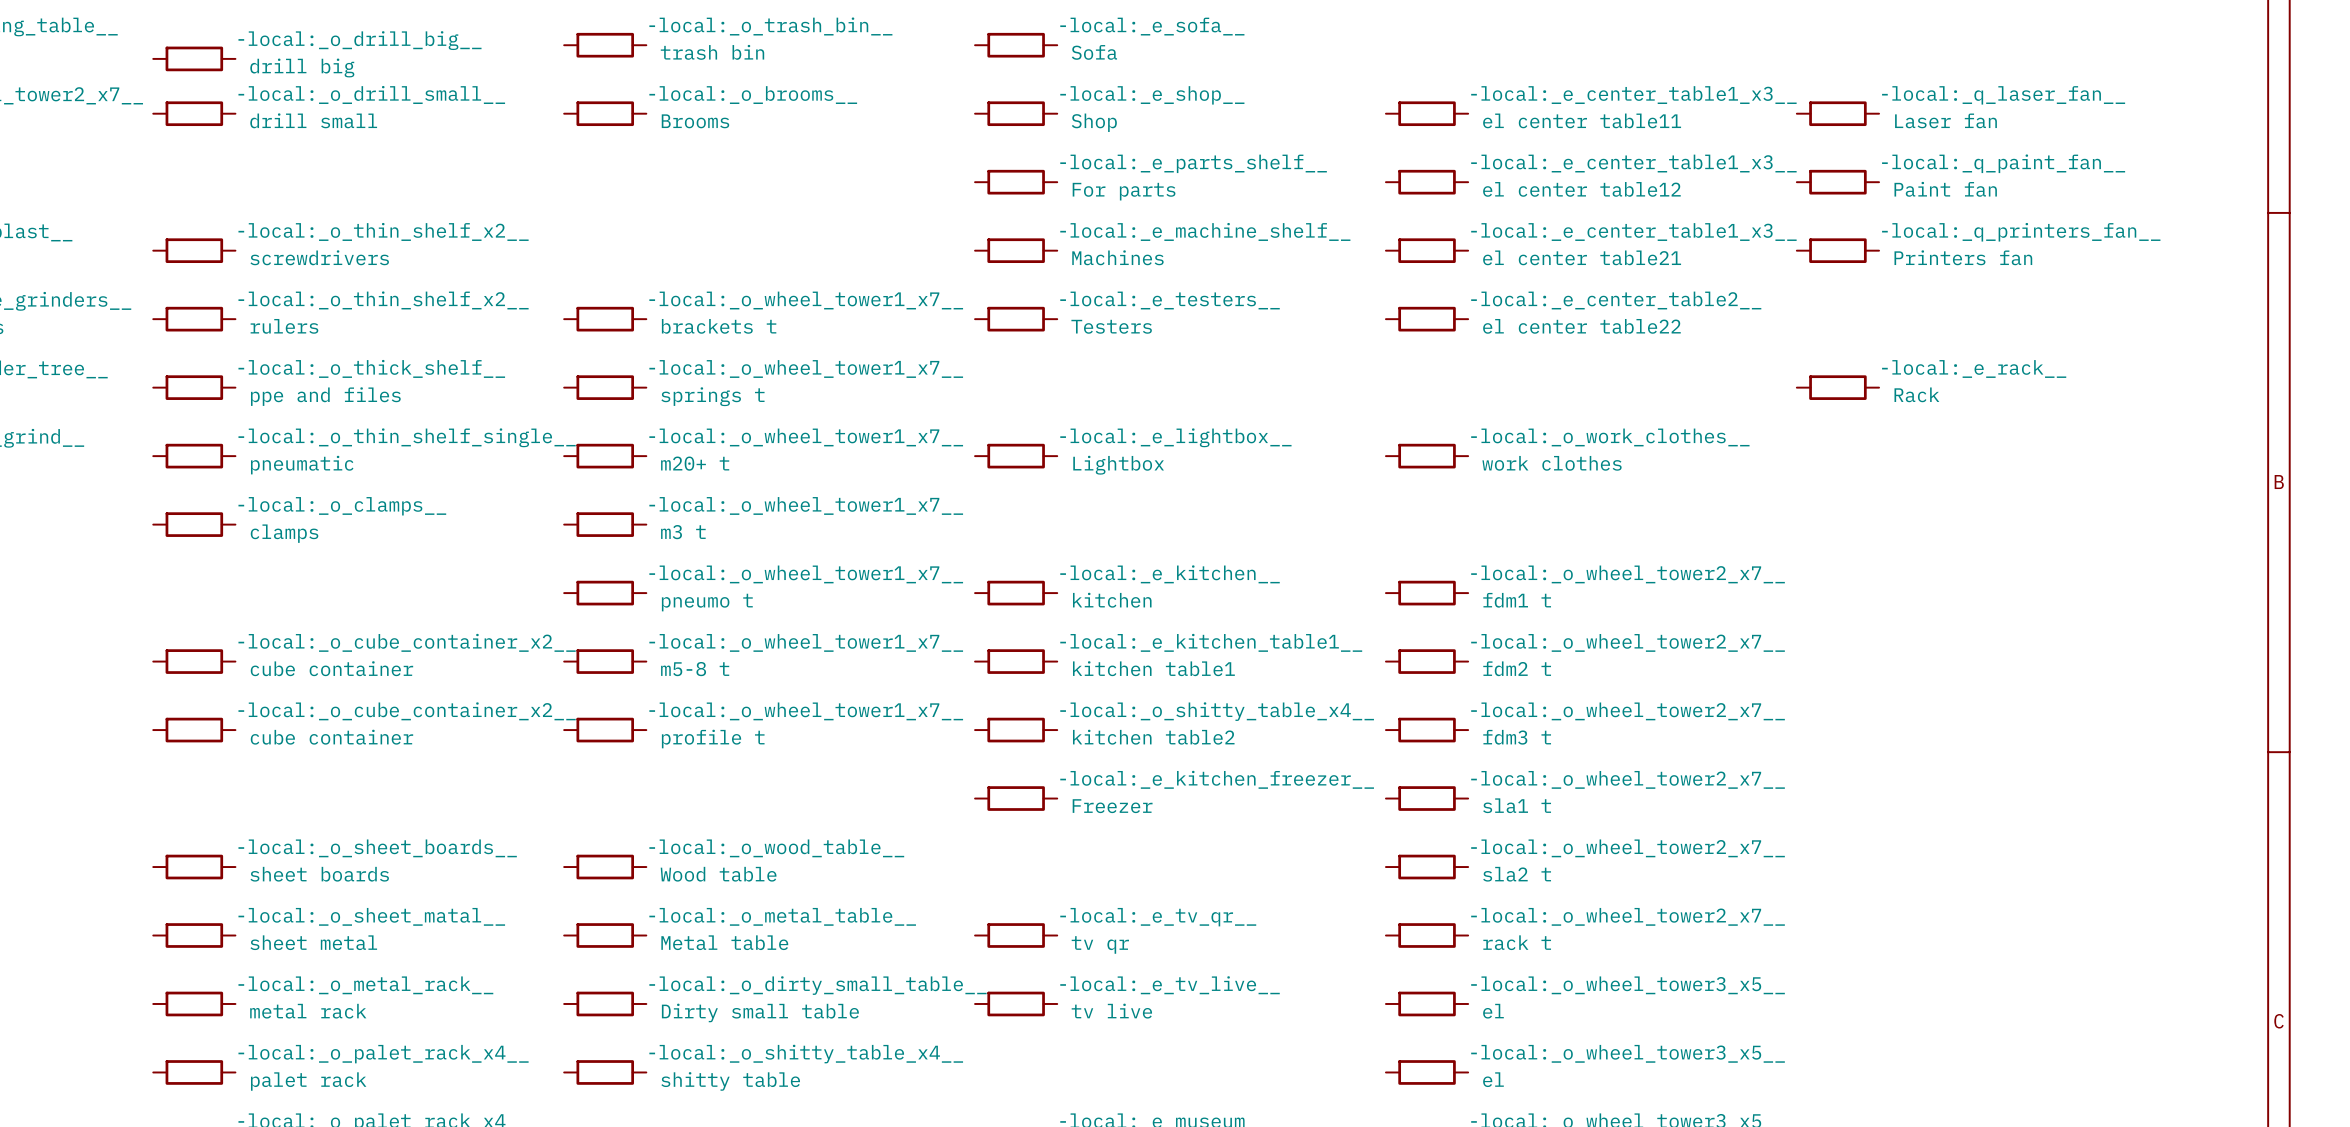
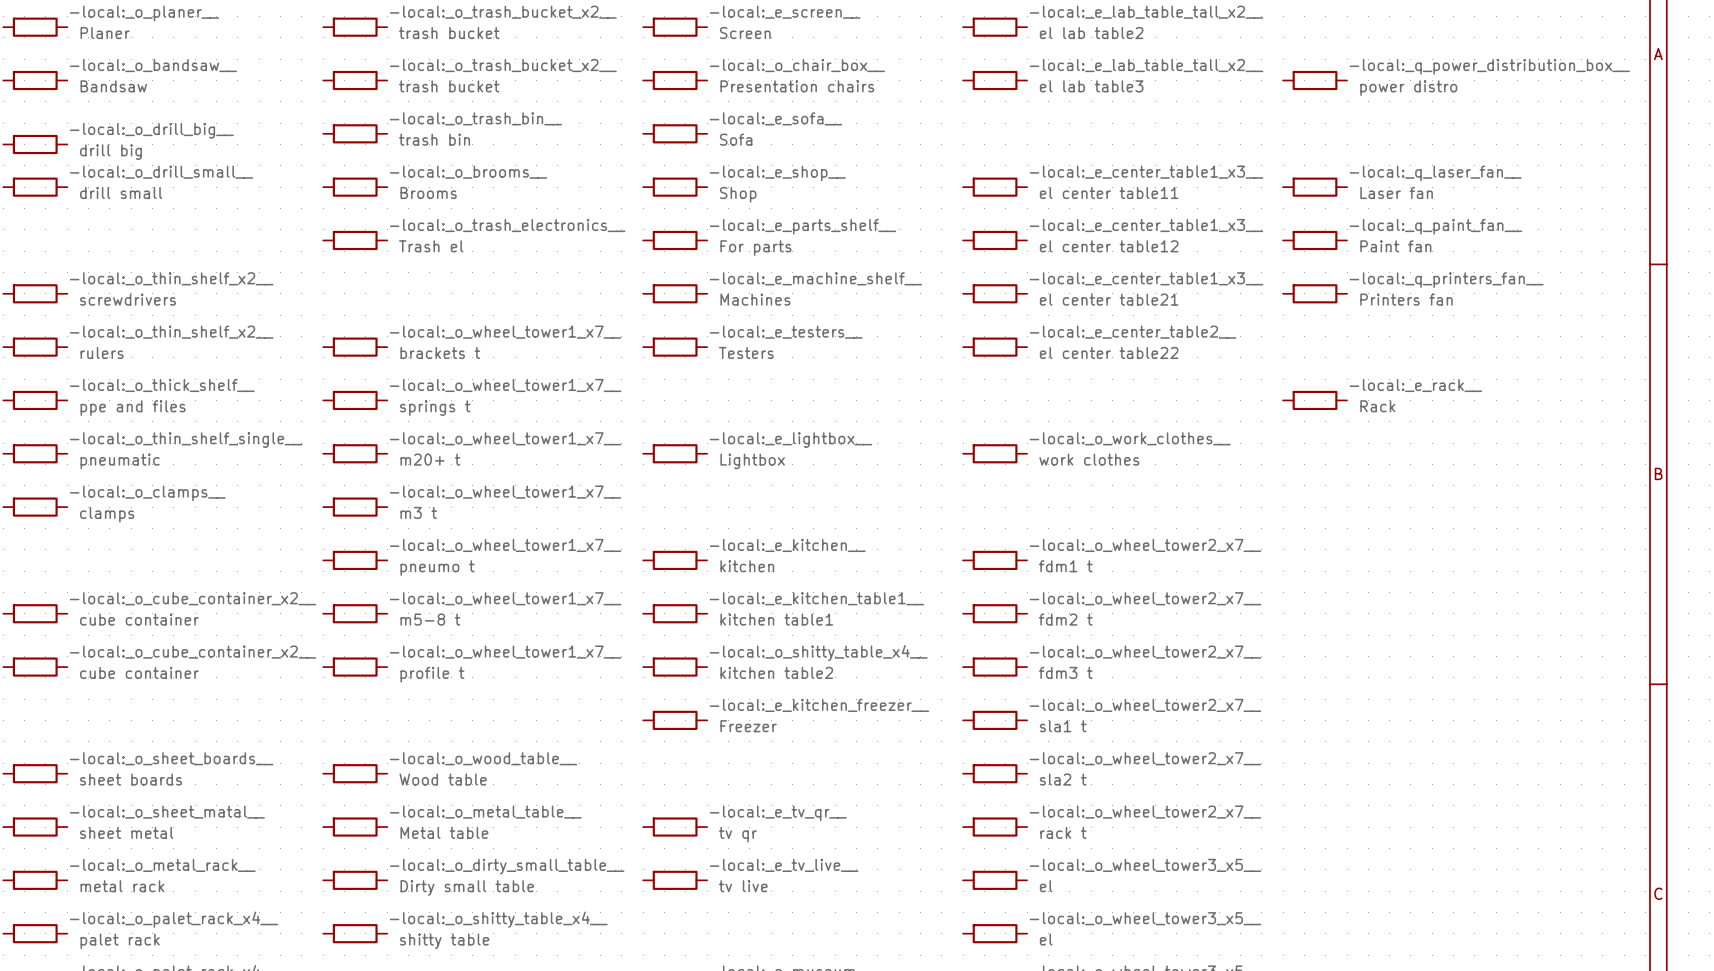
part: none -> Trash el (355, 240)

